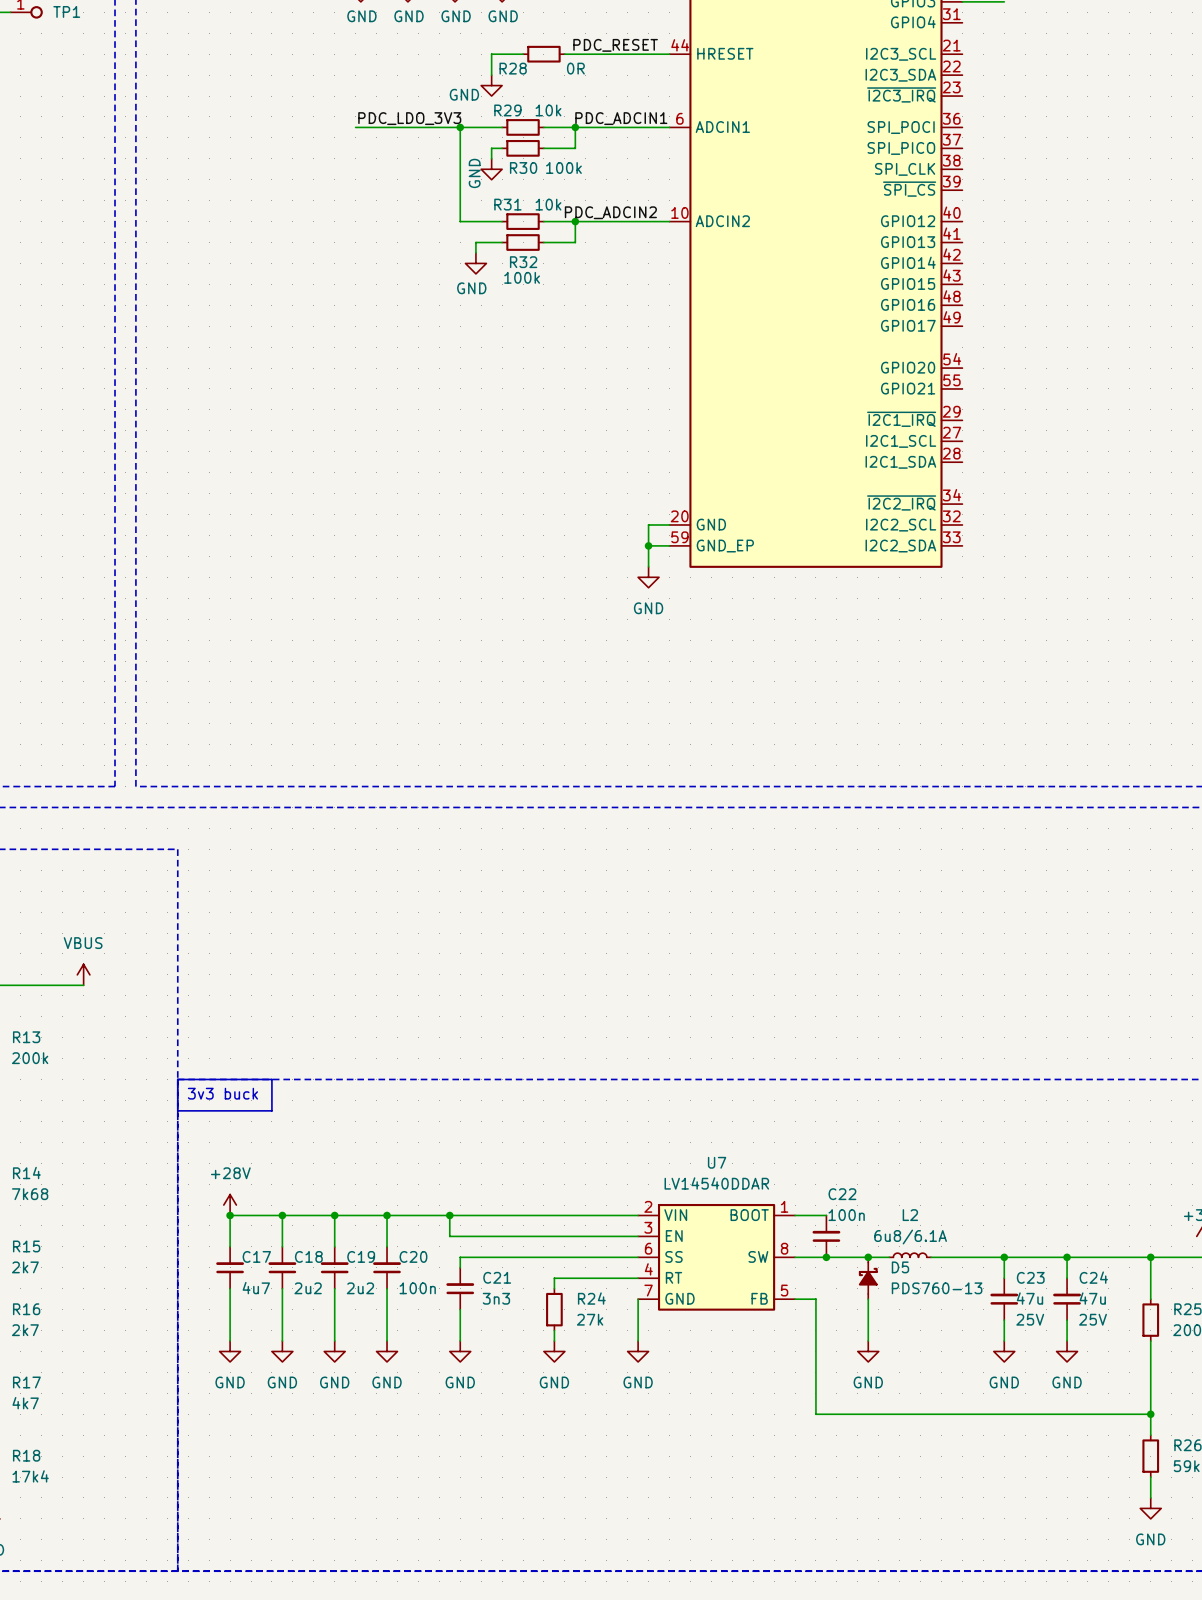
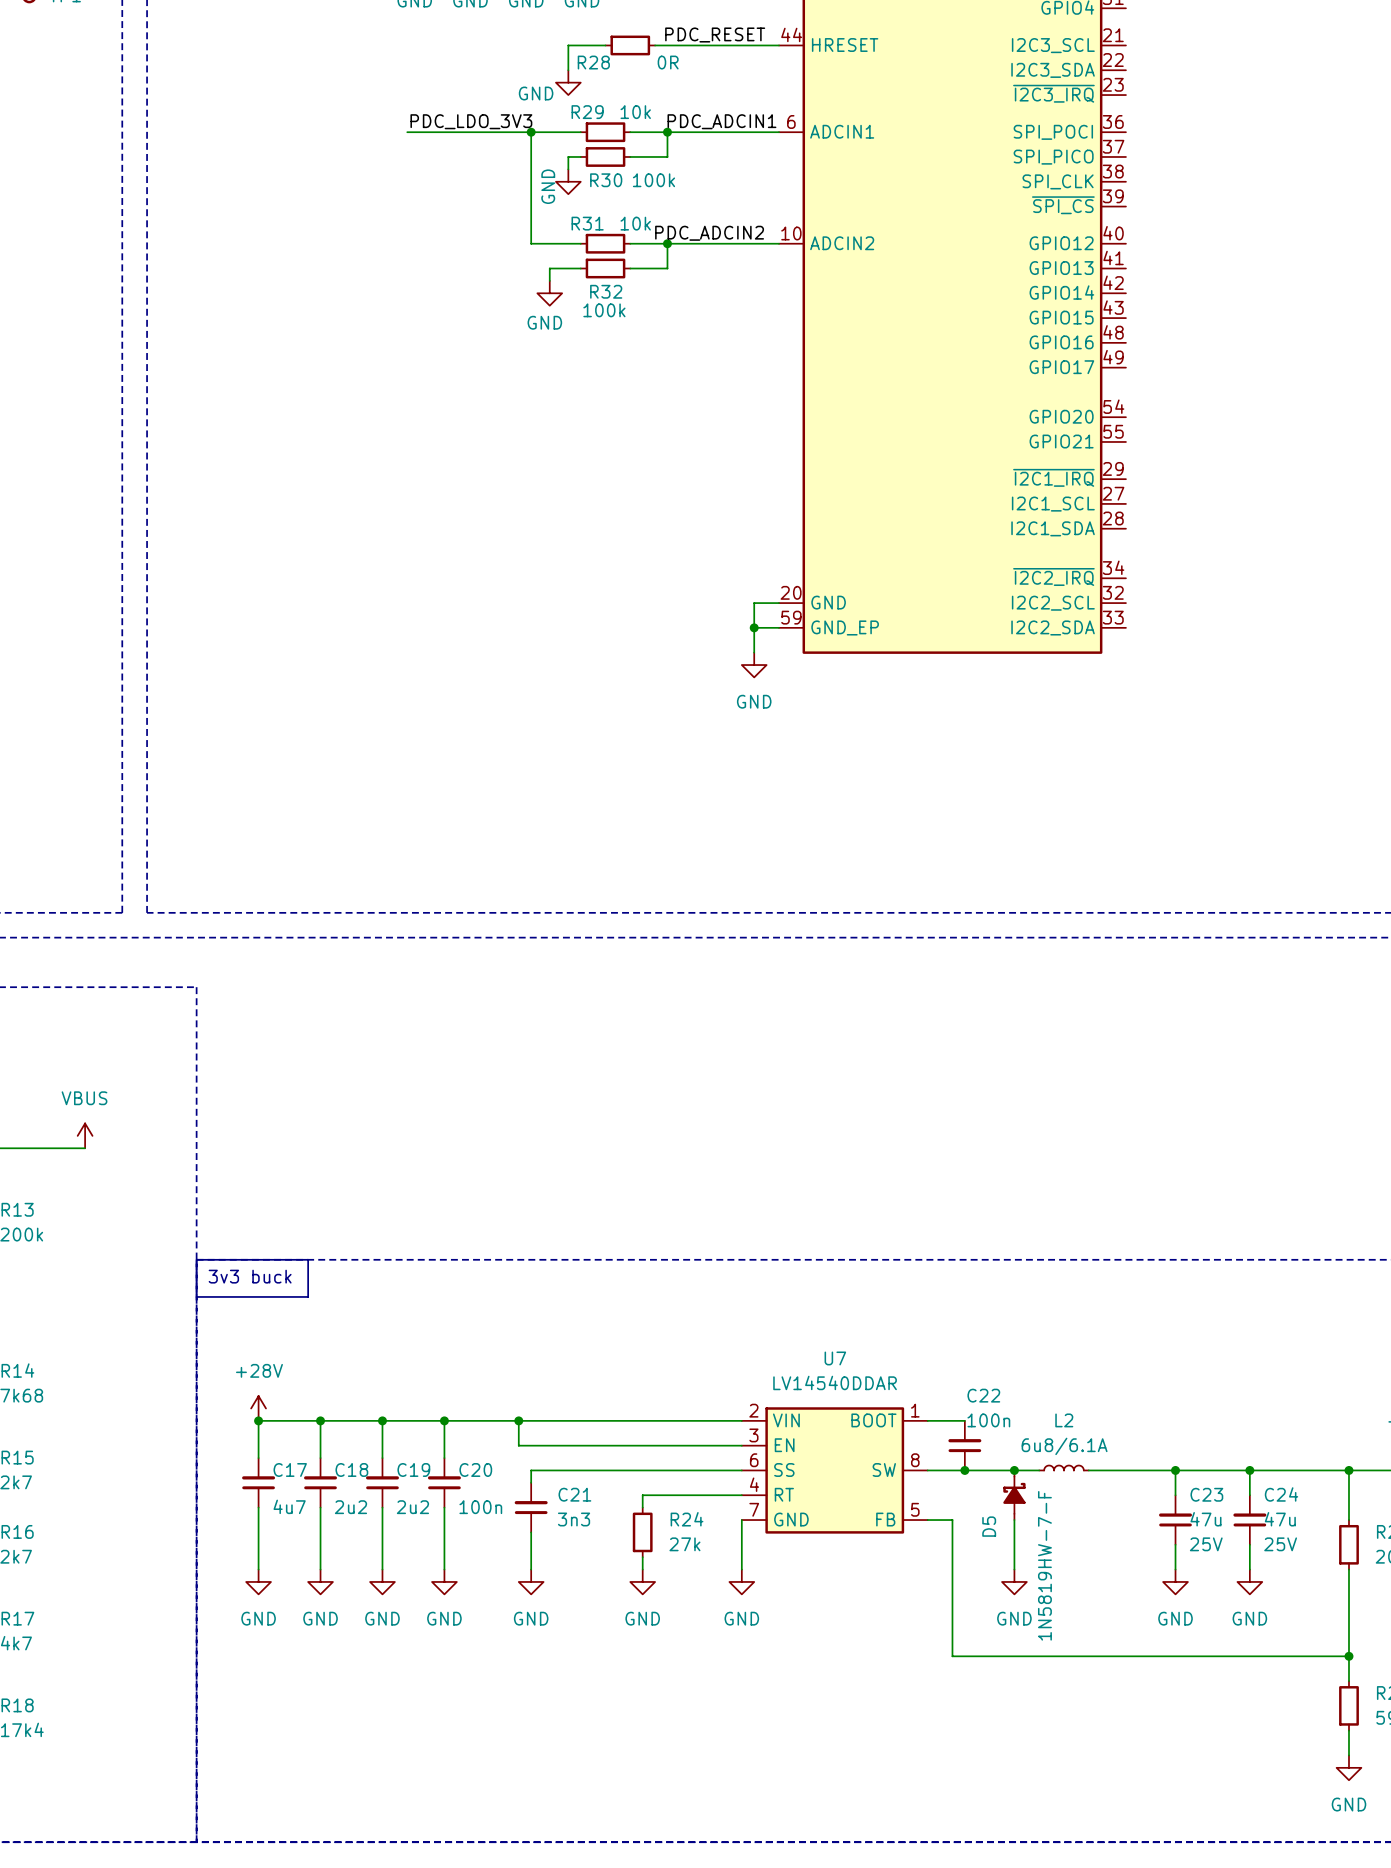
D5 name rotation: 0° (900, 1267) -> 90° counterclockwise (989, 1526)
D5 name position: D5 (900, 1267) -> D5 (989, 1526)
D5 text: PDS760-13 (937, 1288) -> 1N5819HW-7-F (1044, 1565)

